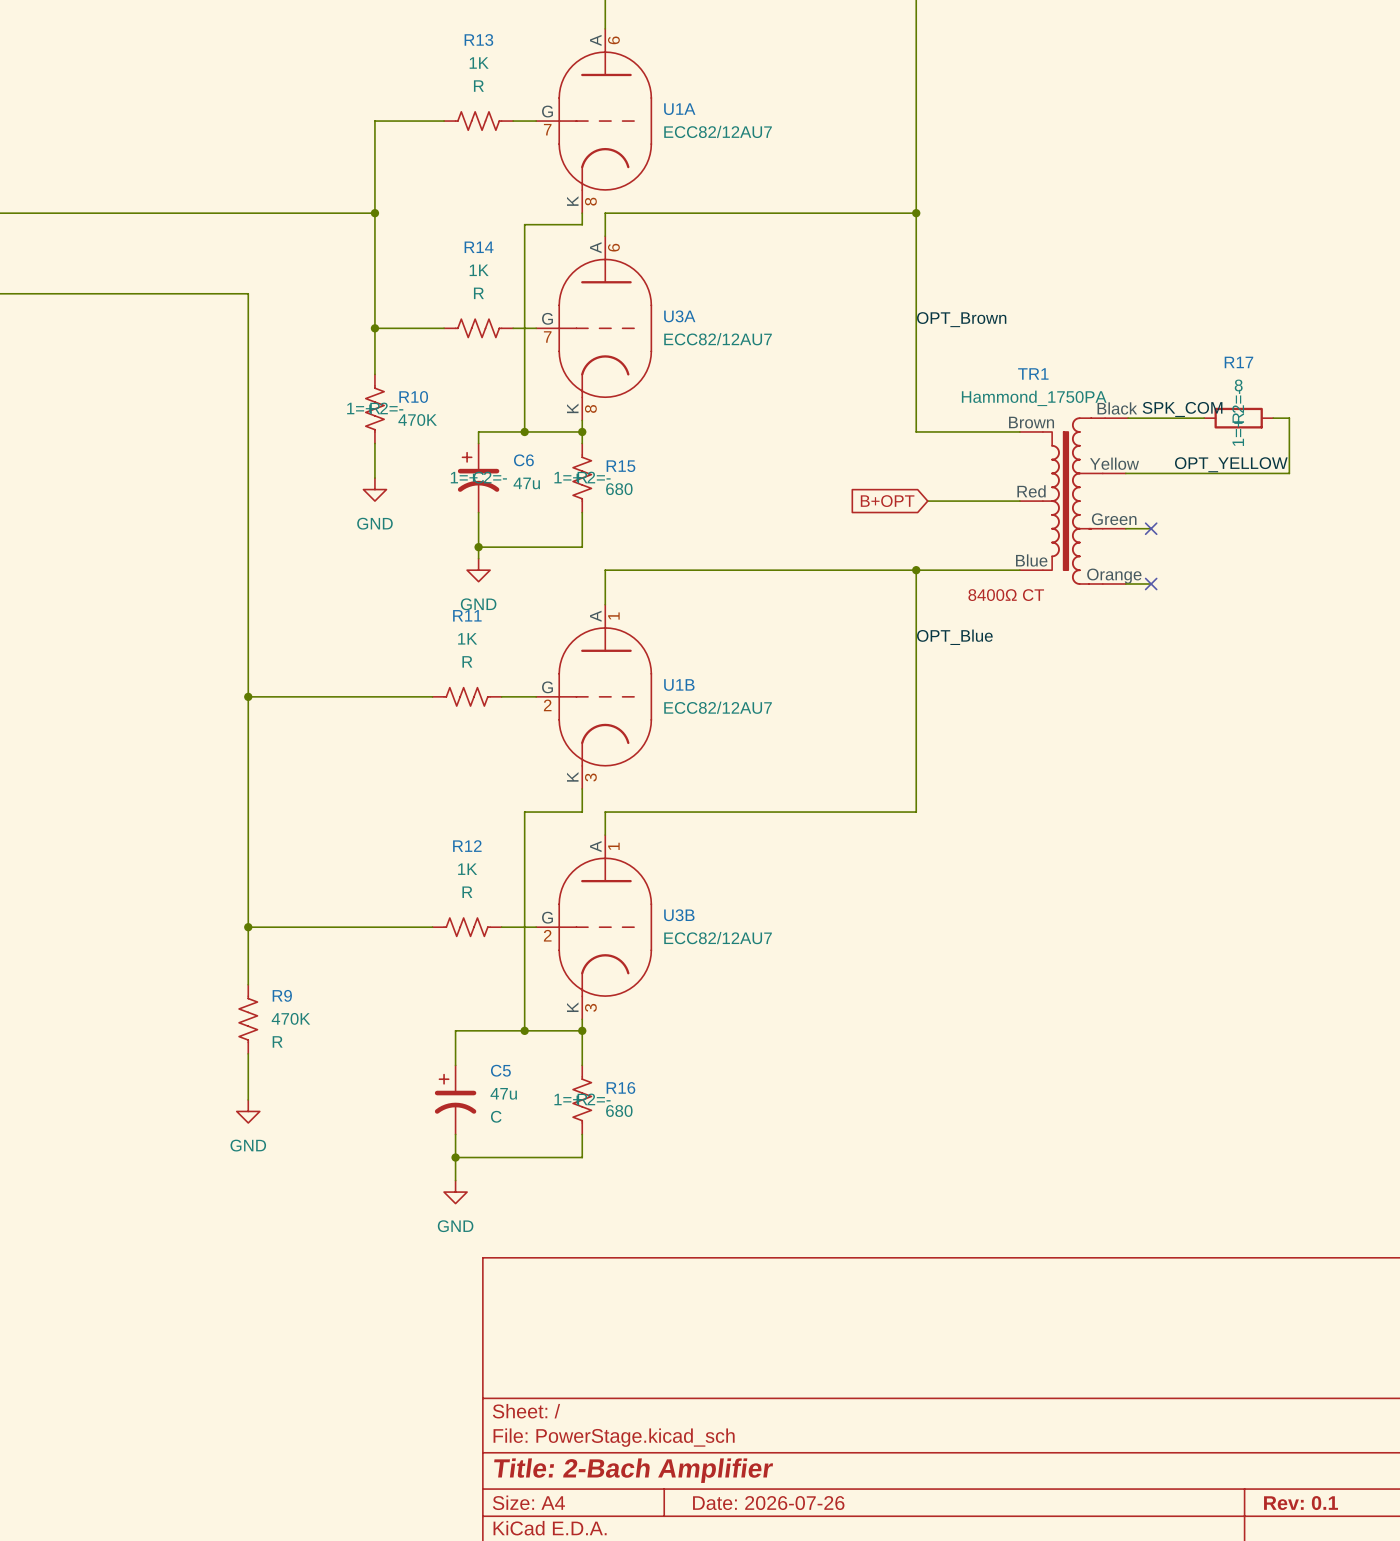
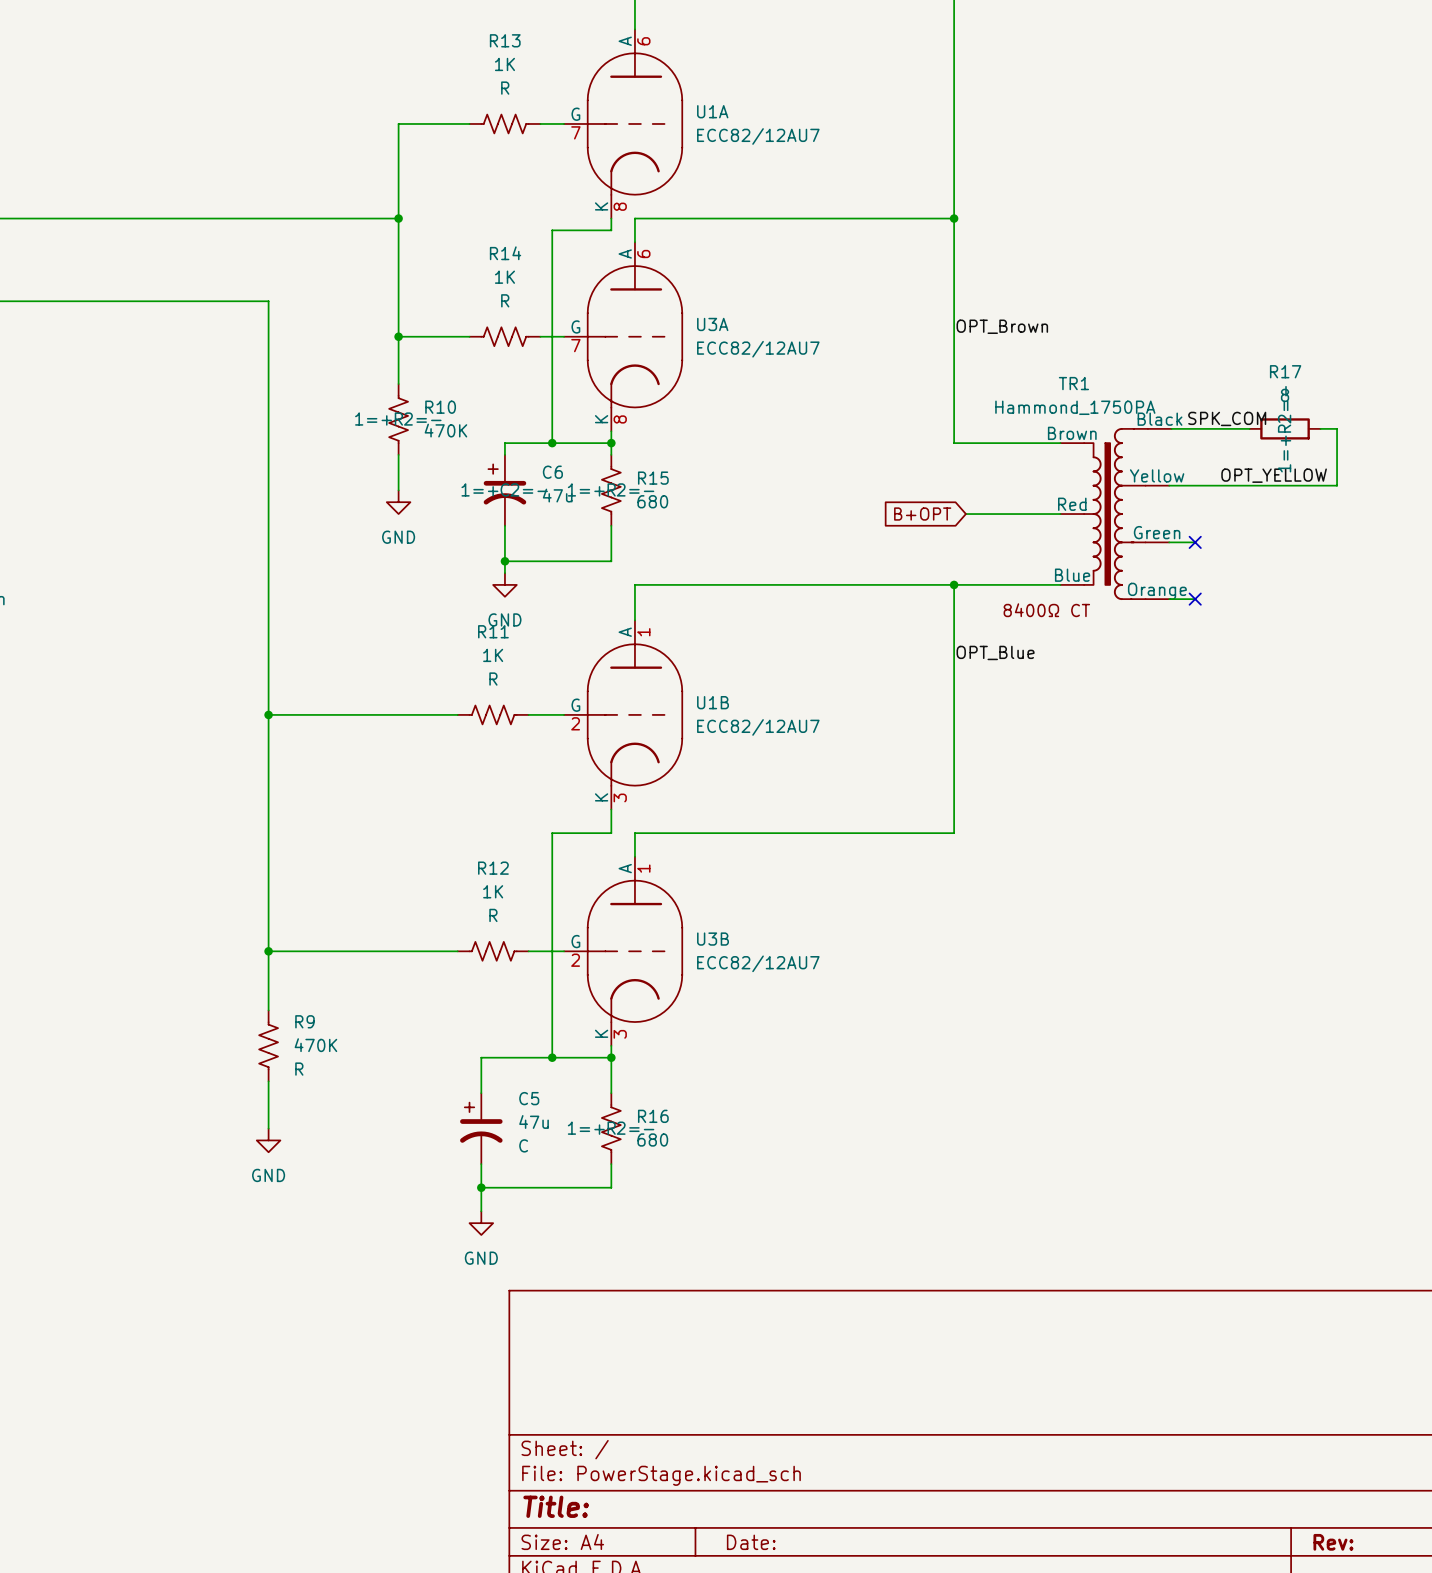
title block: Title: 2-Bach Amplifier (633, 1470) -> Title: (556, 1506)
title block: Date: 2026-07-26 (768, 1503) -> Date: (751, 1542)
title block: Rev: 0.1 (1301, 1503) -> Rev: (1333, 1542)

